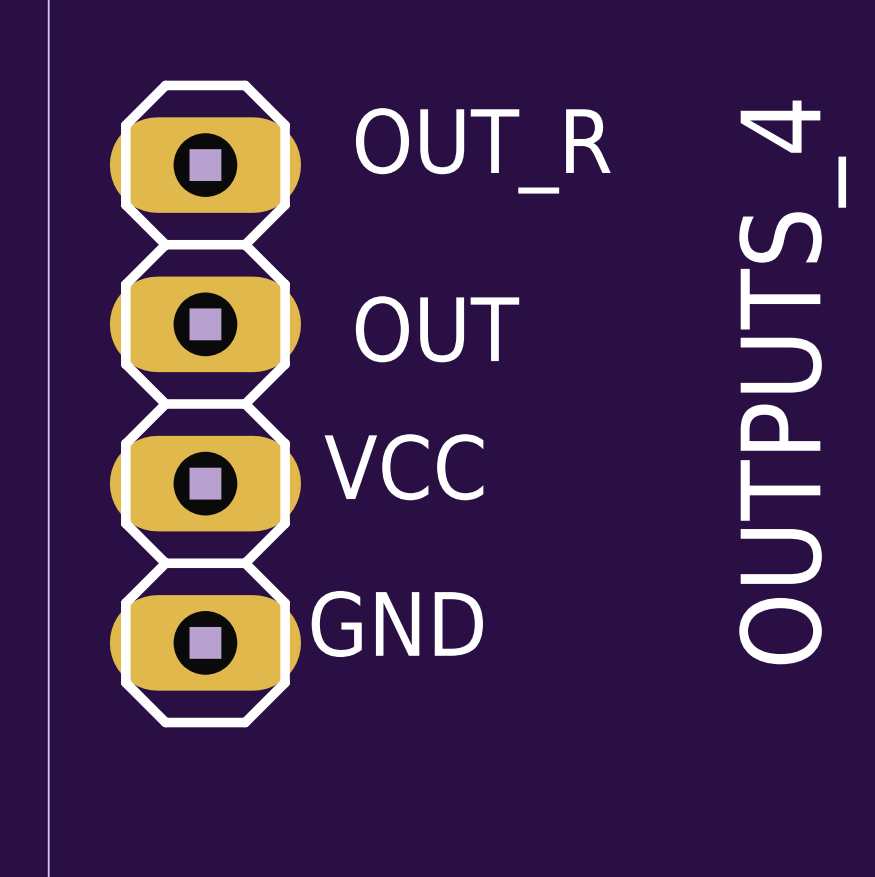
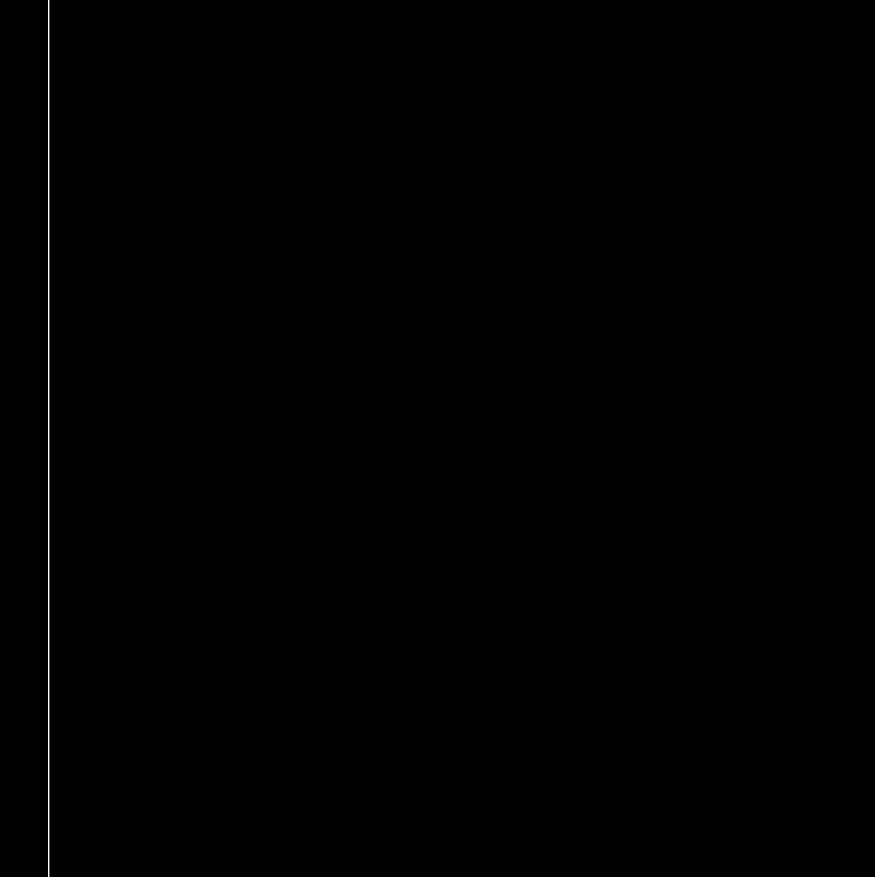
text: OUT_R (483, 150) -> none
text: OUT (437, 329) -> none
OUTPUTS_4: (205, 403) -> none
text: VCC (403, 467) -> none
text: GND (397, 624) -> none

